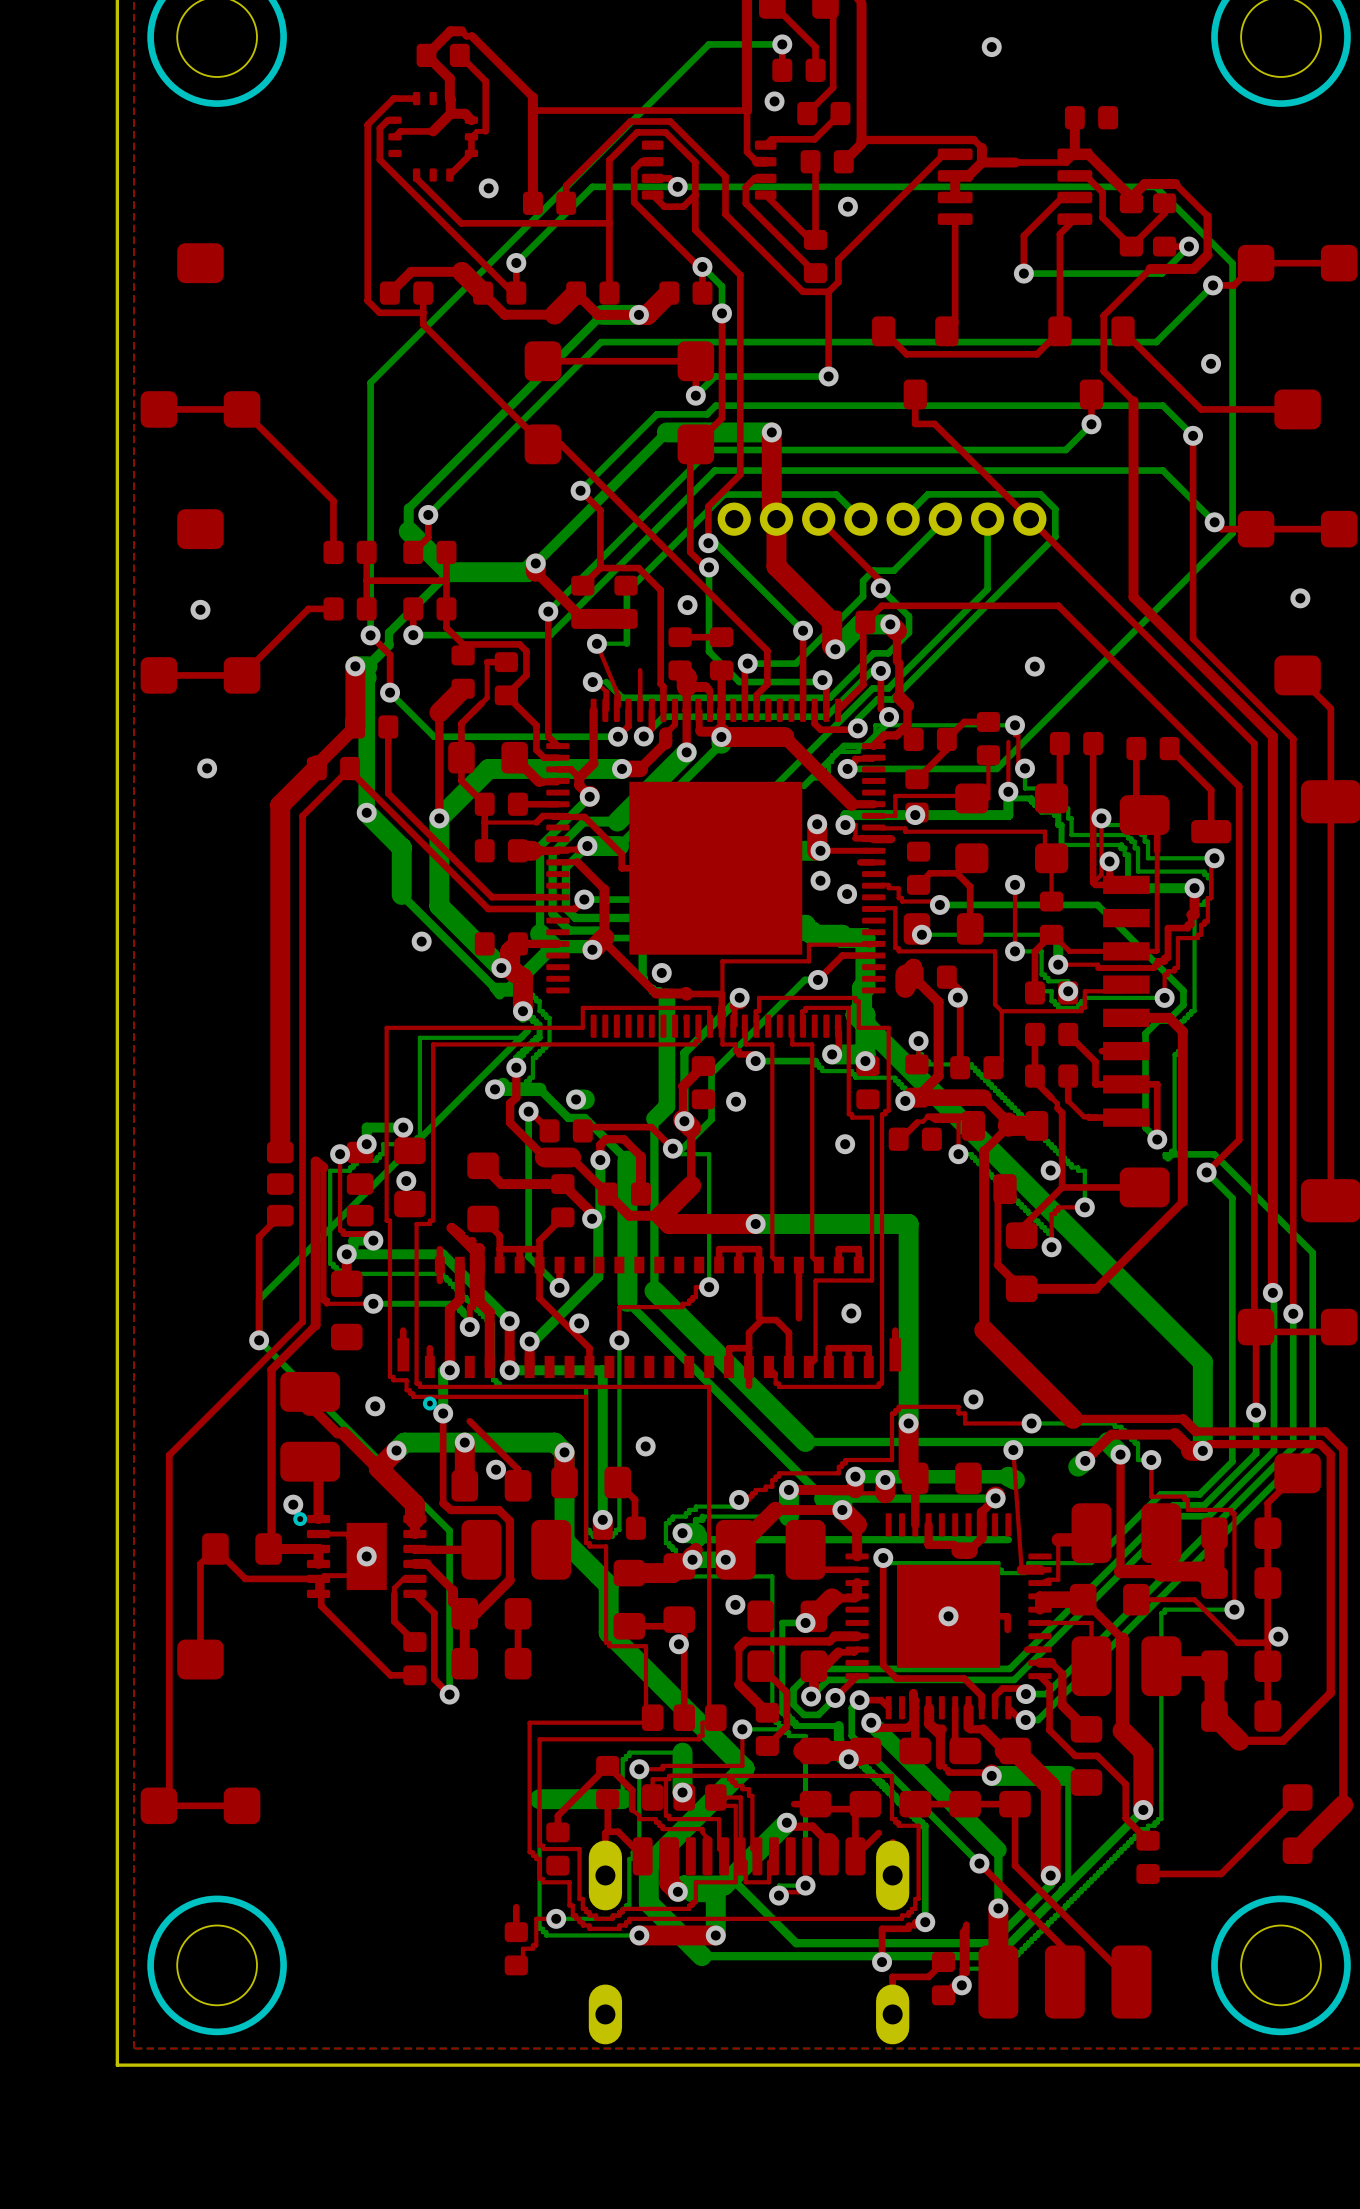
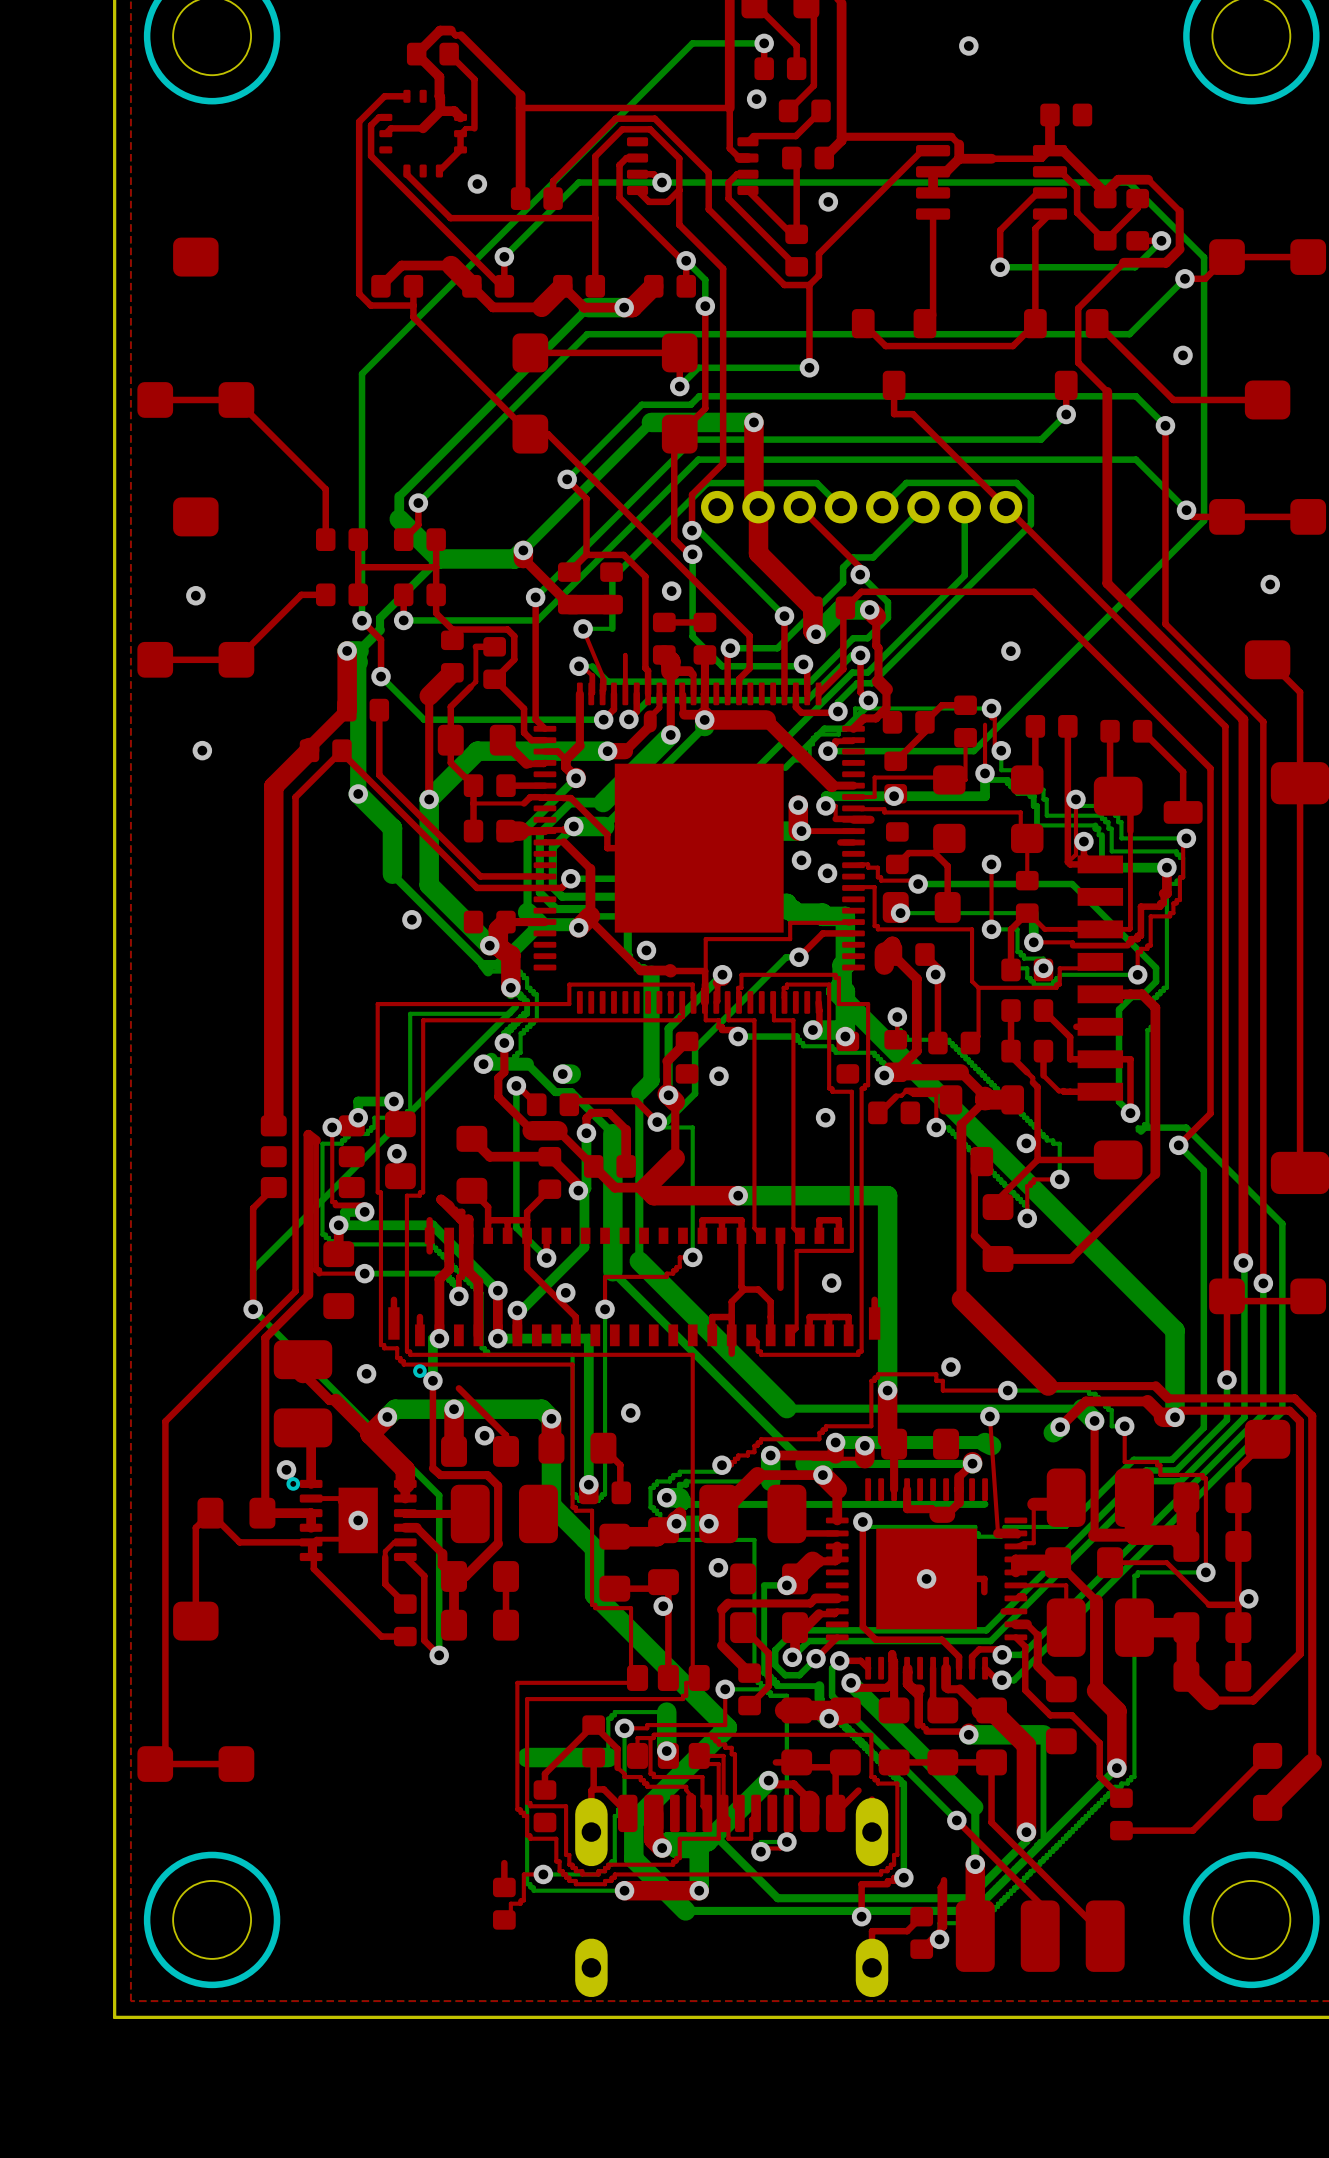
top track: none -> (1024, 1595) (1019, 1595) (1015, 1598)

